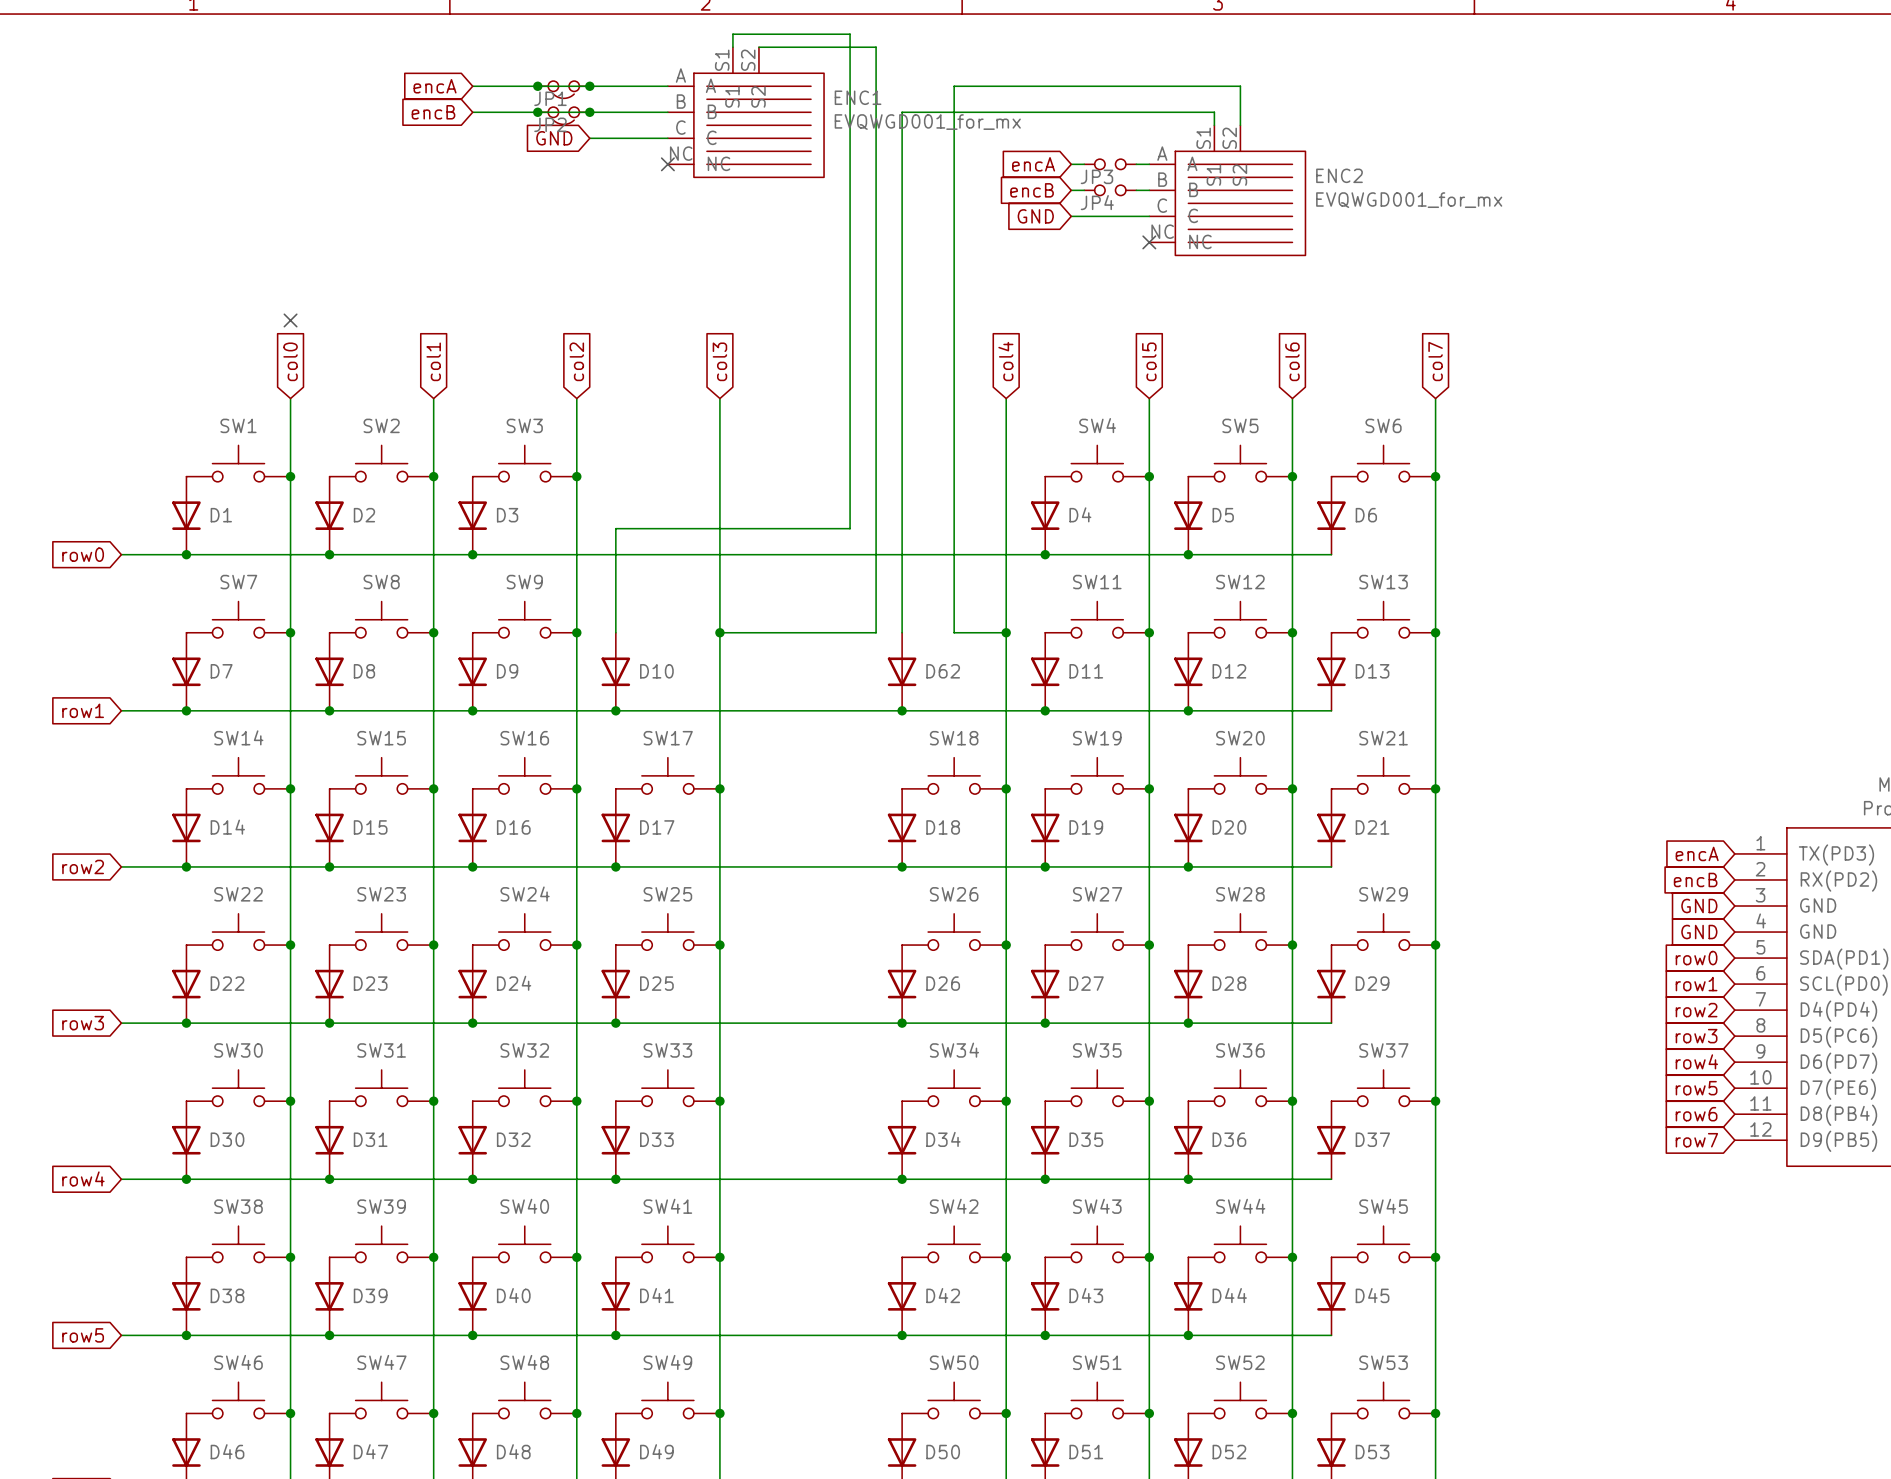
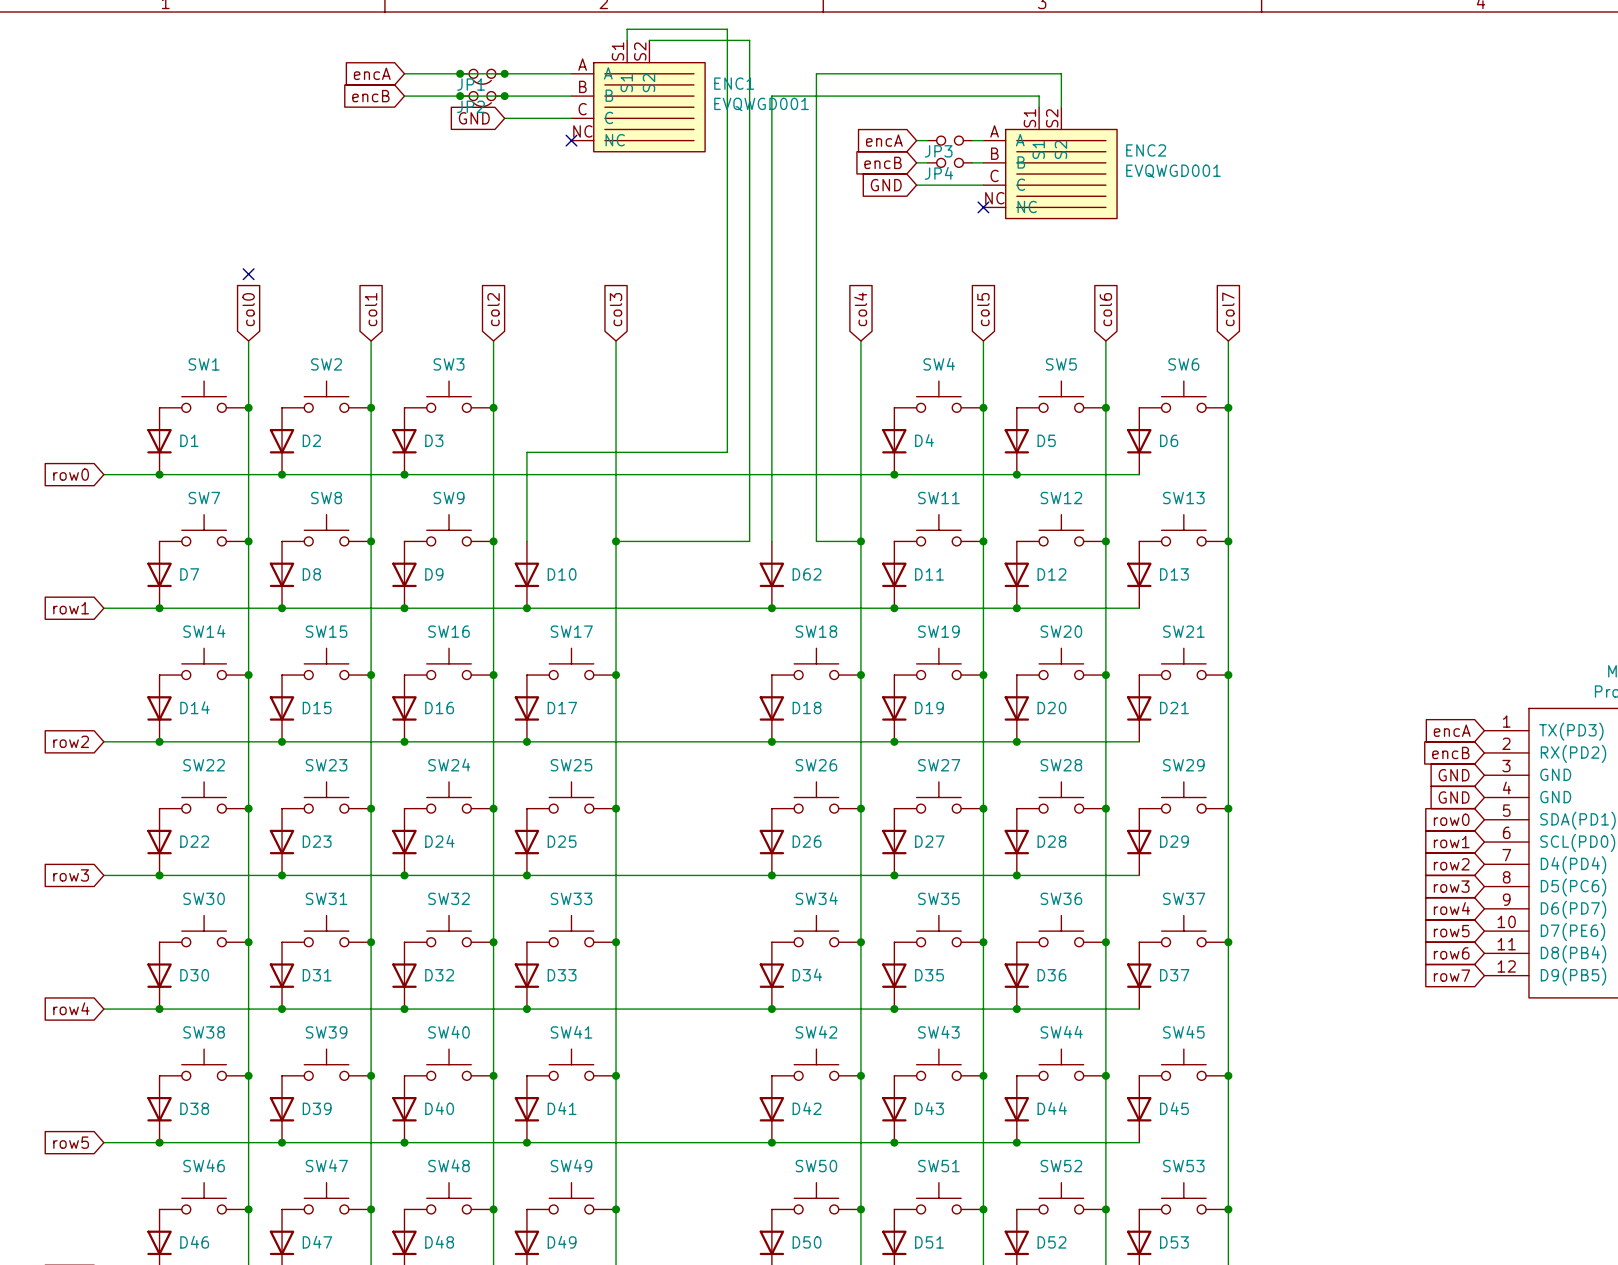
ENC1 value: EVQWGD001_for_mx (927, 122) -> EVQWGD001 (761, 104)
ENC2 value: EVQWGD001_for_mx (1409, 200) -> EVQWGD001 (1173, 171)

